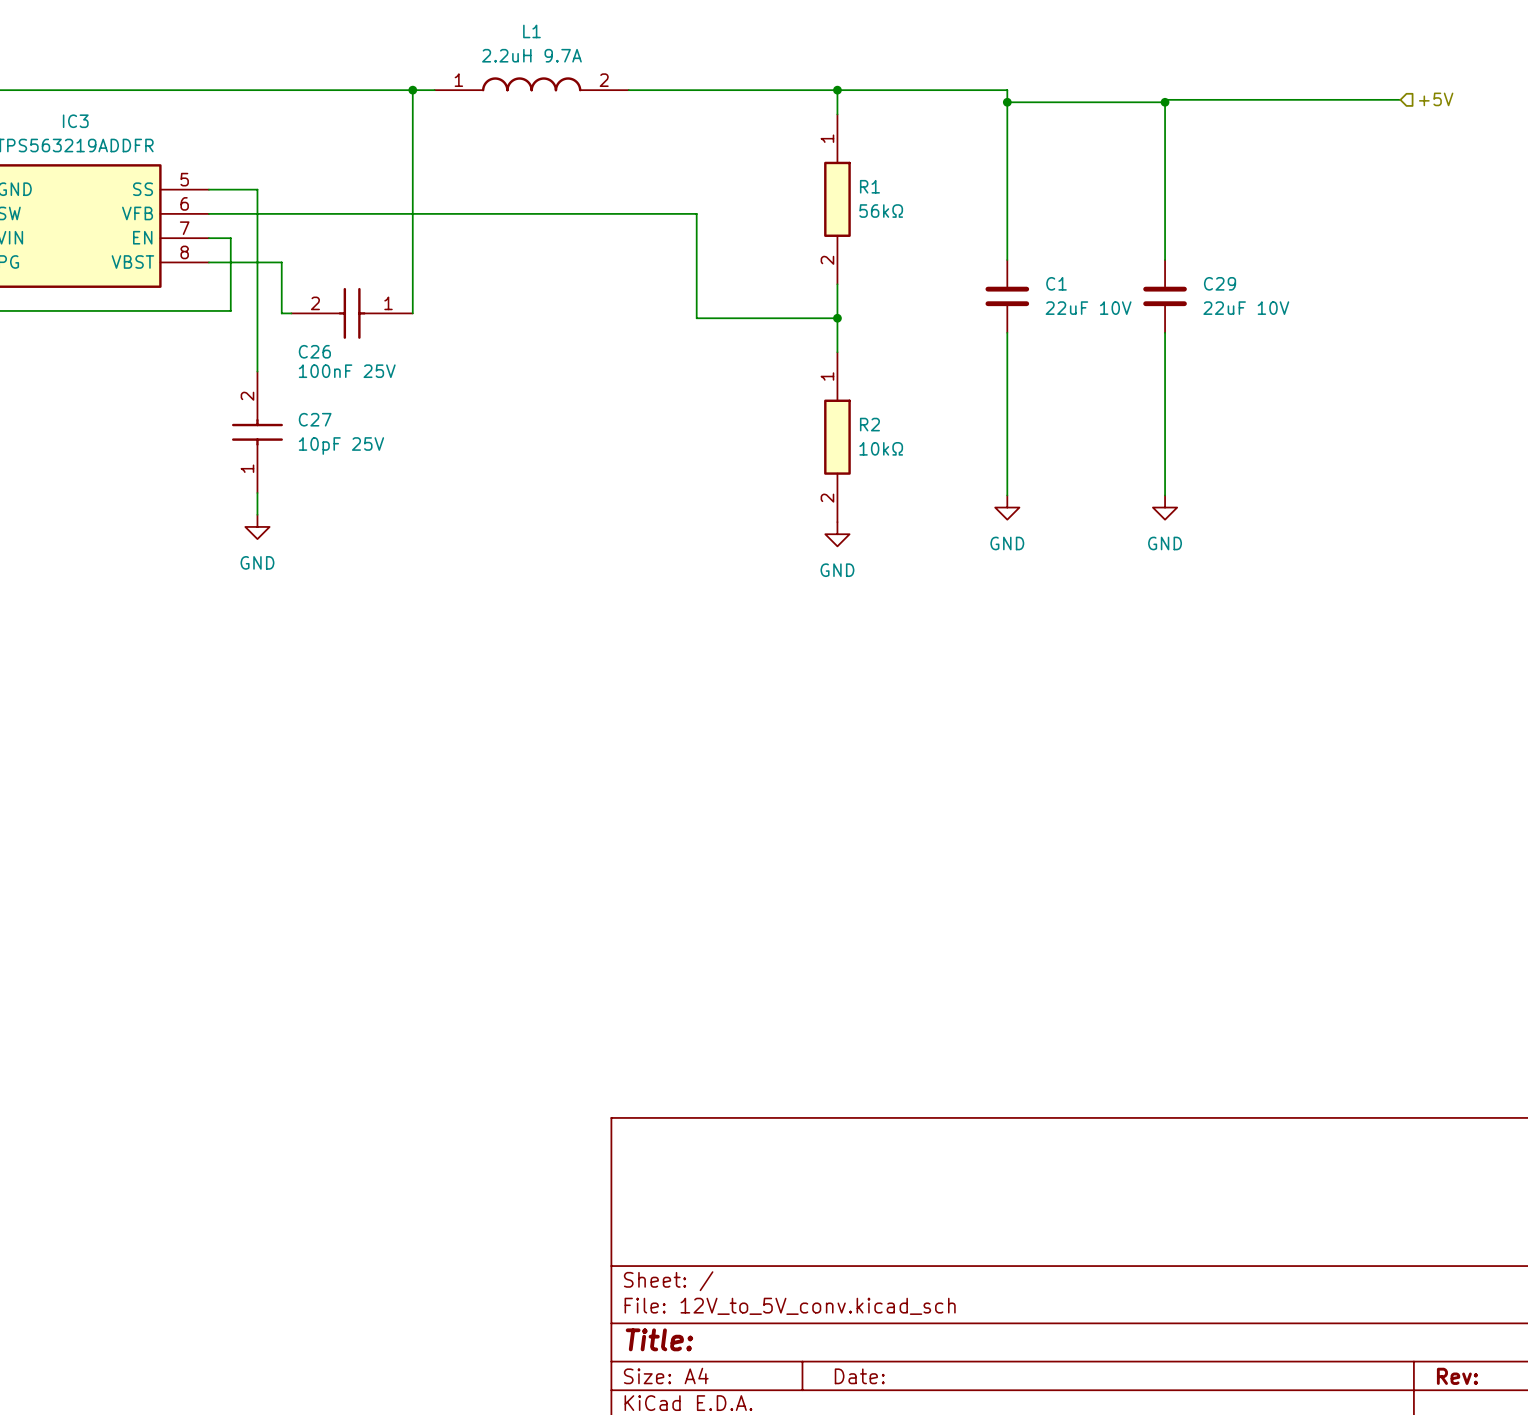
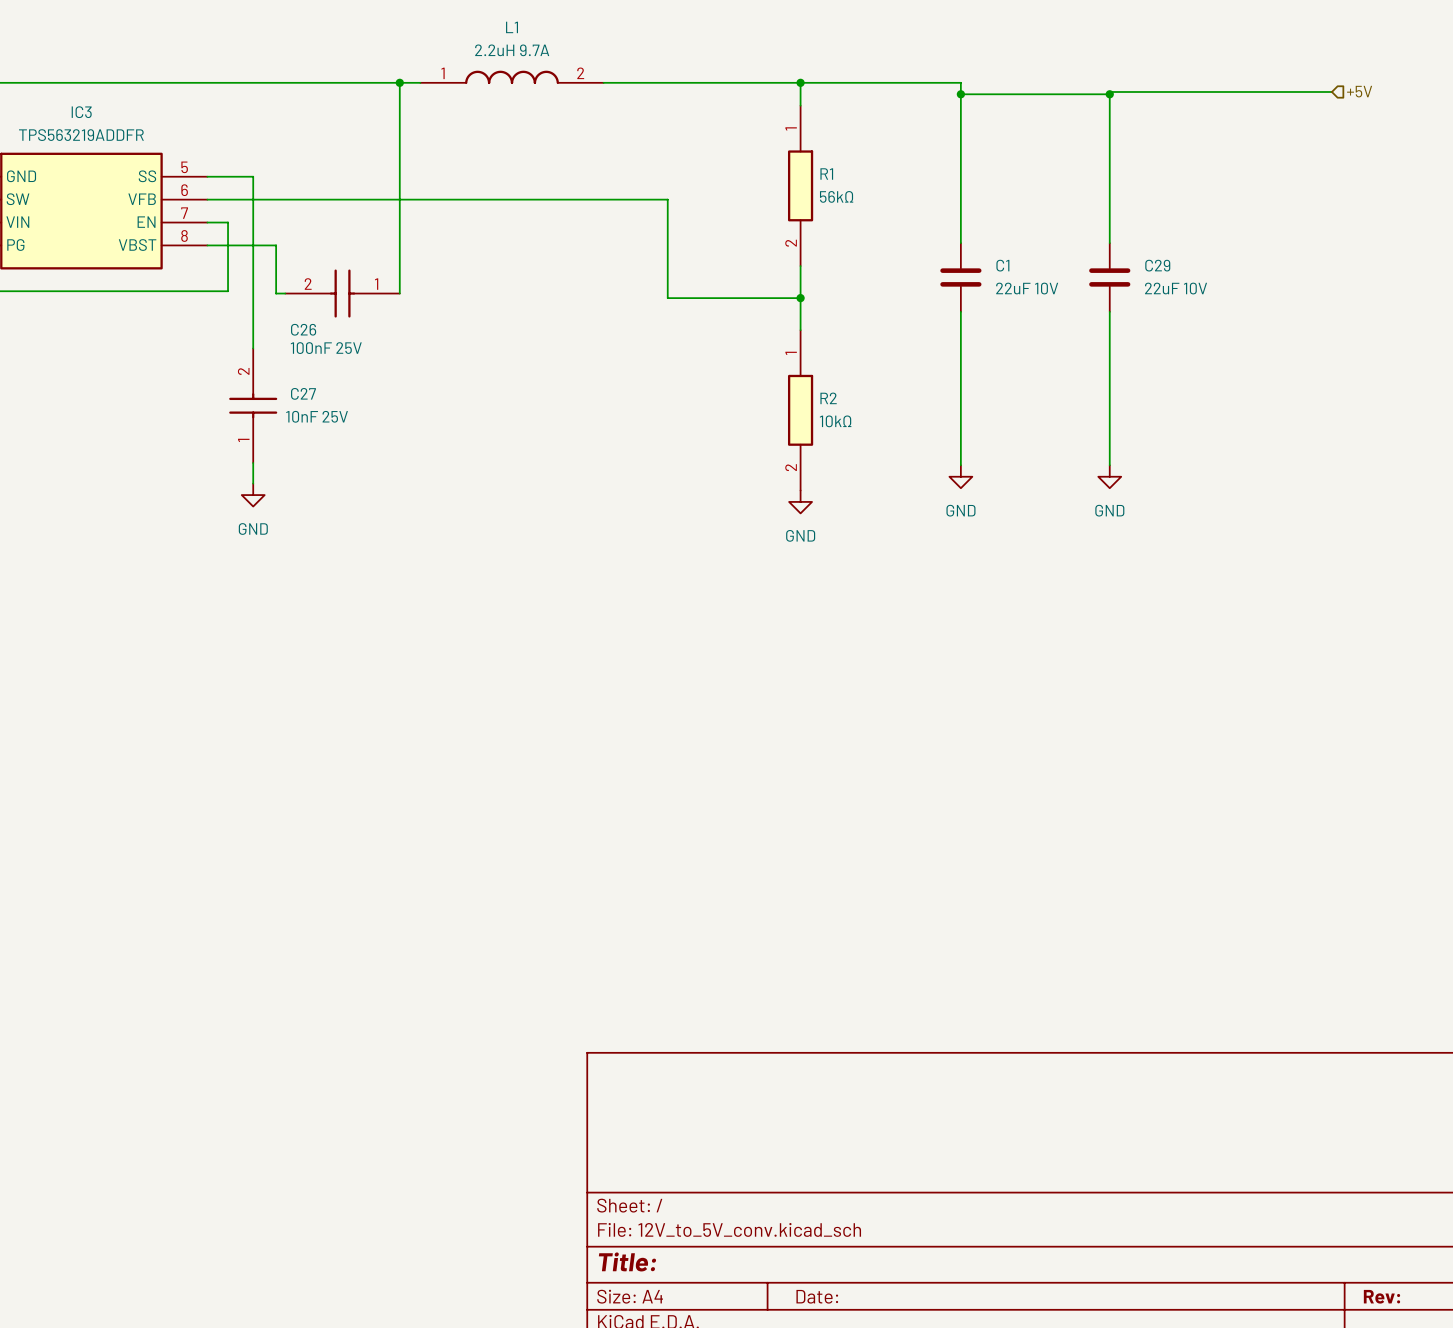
C27 value: 10pF 25V (341, 446) -> 10nF 25V (317, 416)

